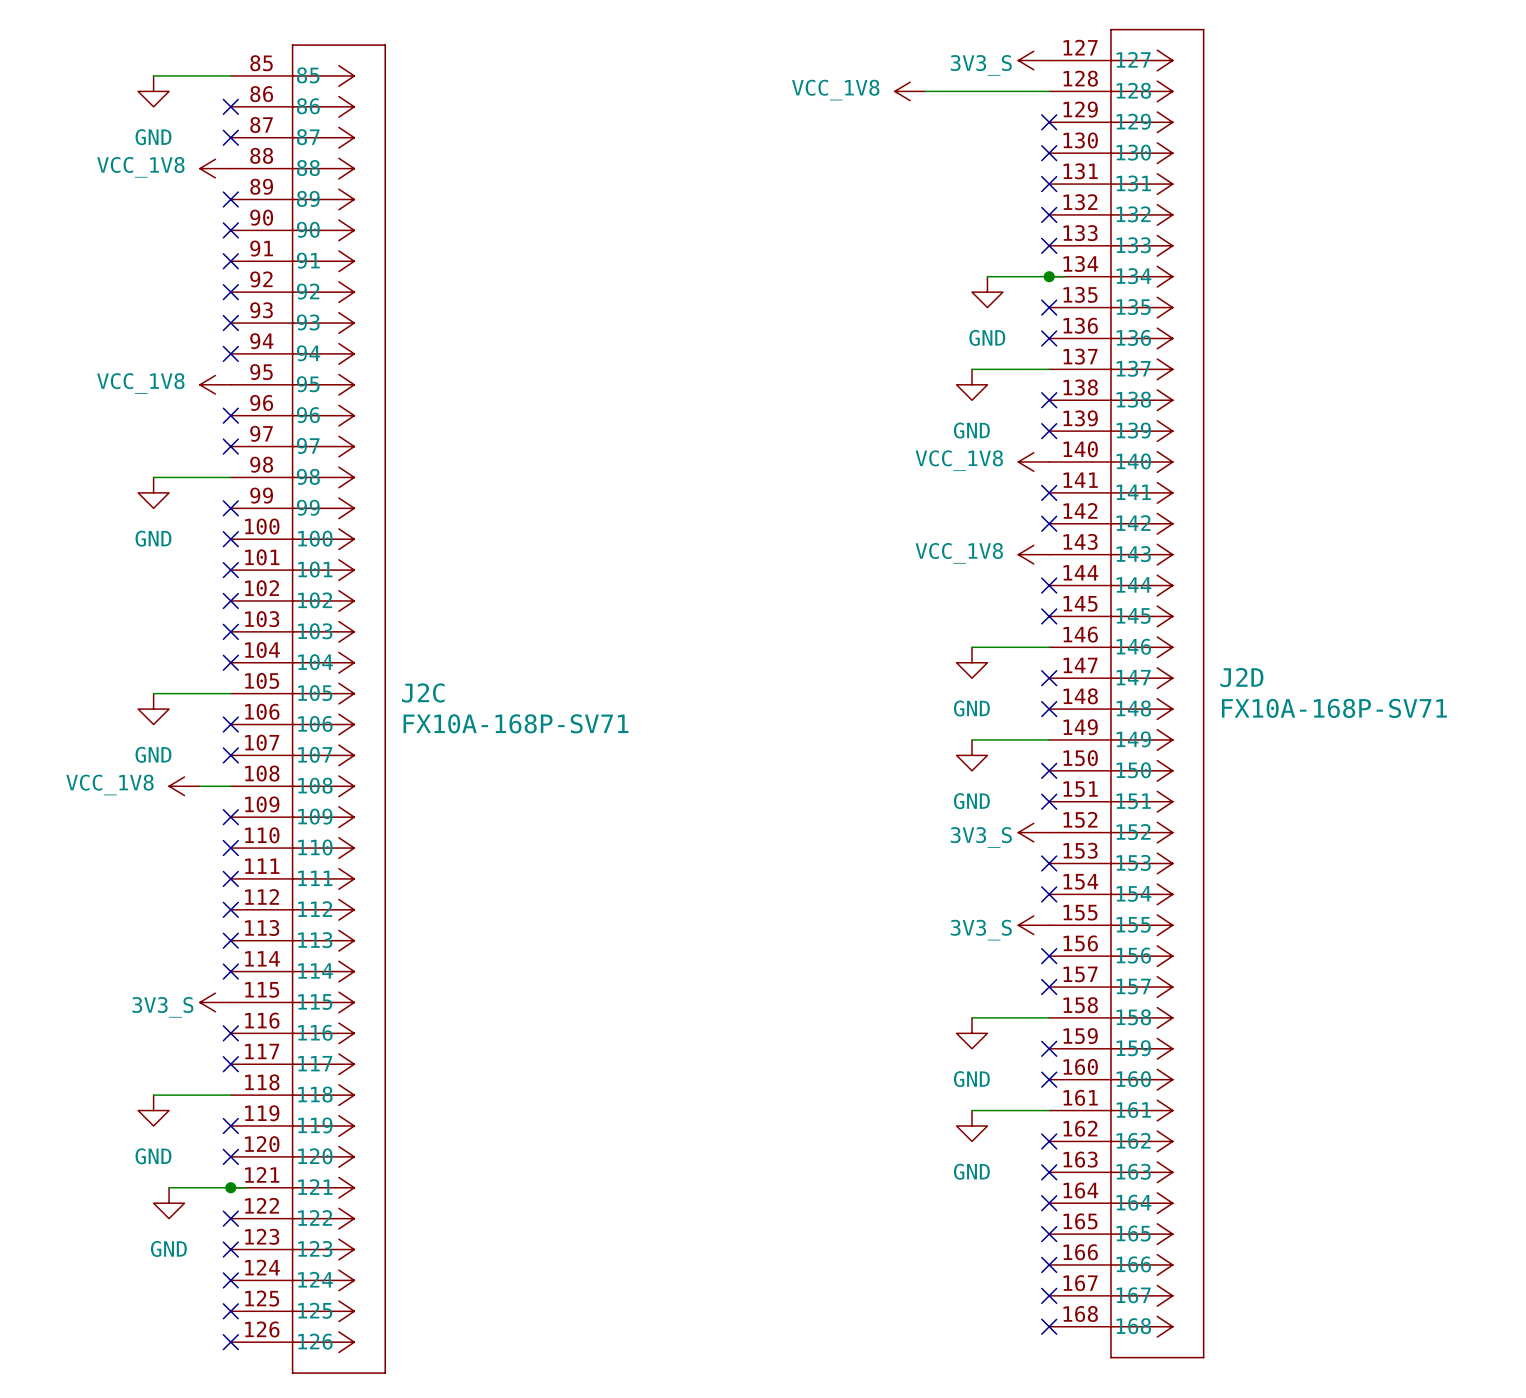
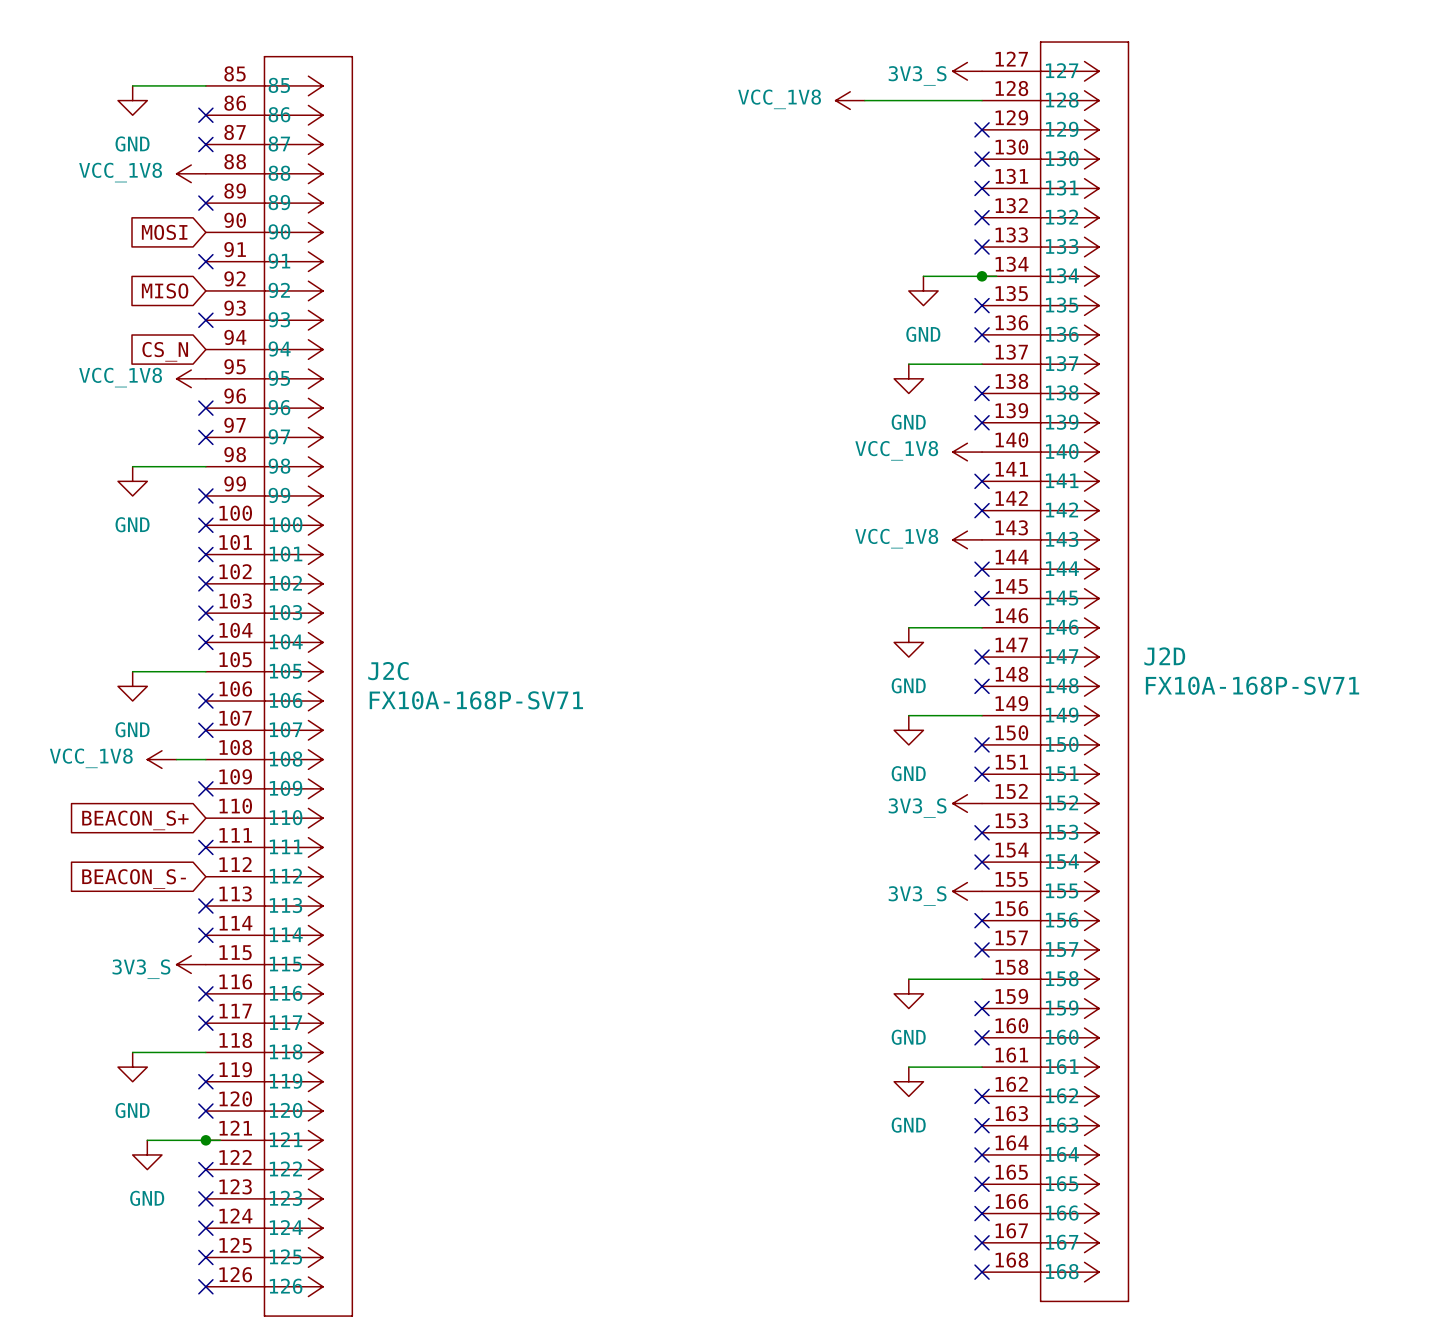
global label: none -> MOSI (164, 232)
no-connect mark: (230, 230) -> none
global label: none -> MISO (165, 290)
no-connect mark: (230, 292) -> none
no-connect mark: (230, 353) -> none
global label: none -> CS_N (165, 351)
no-connect mark: (230, 848) -> none
global label: none -> BEACON_S+ (135, 820)
no-connect mark: (230, 909) -> none
global label: none -> BEACON_S- (134, 878)

